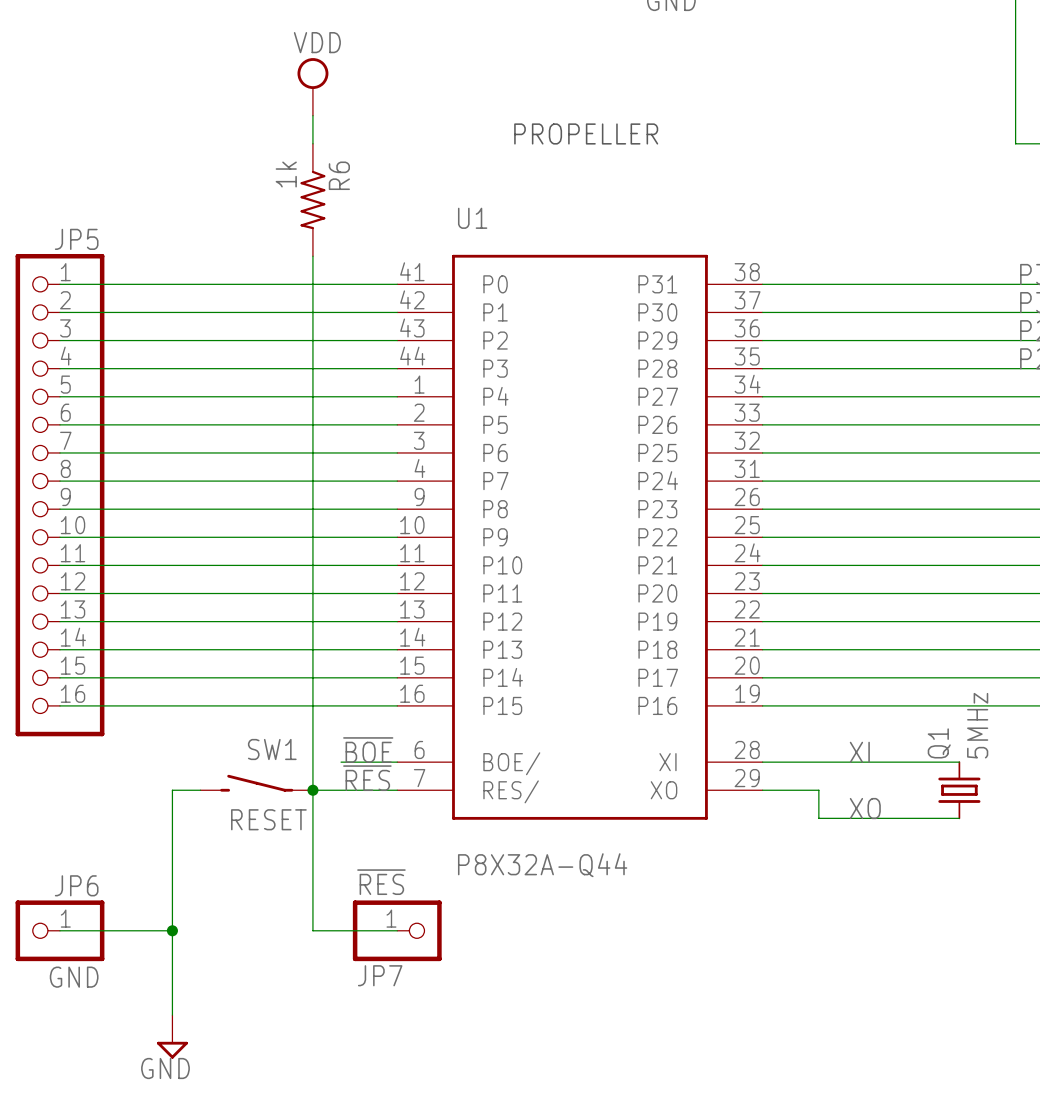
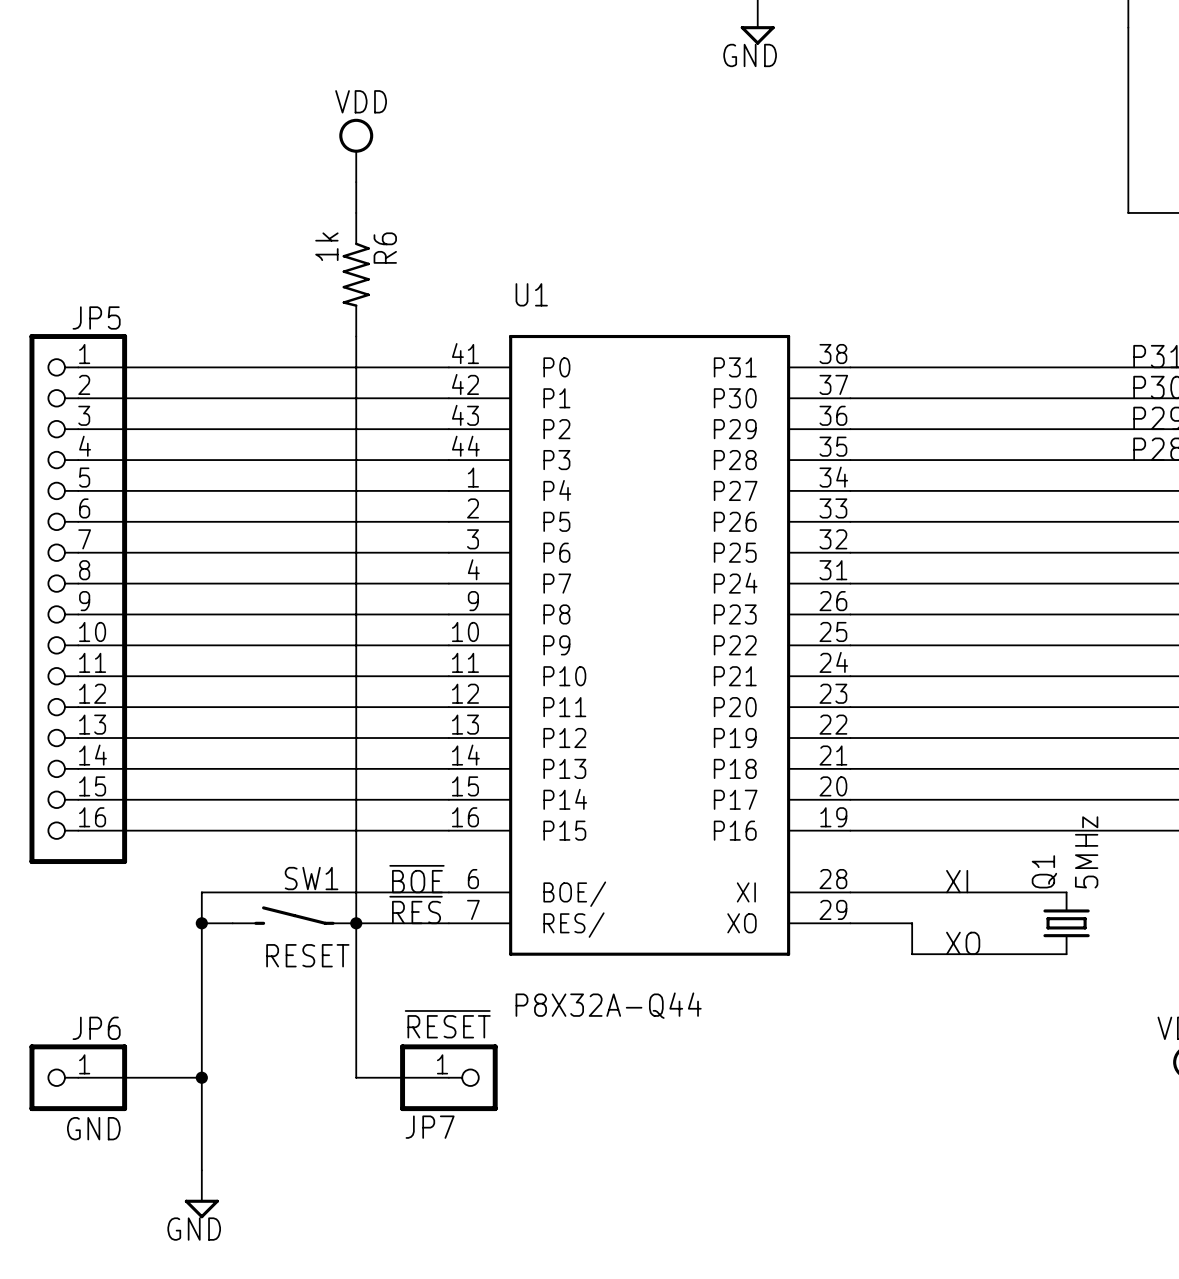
text: PROPELLER (586, 133) -> none
wire: none -> (387, 892) (201, 892) (201, 923)
junction: none -> (201, 923)
JP7 value: ~{RES} (381, 882) -> ~{RESET} (447, 1024)

